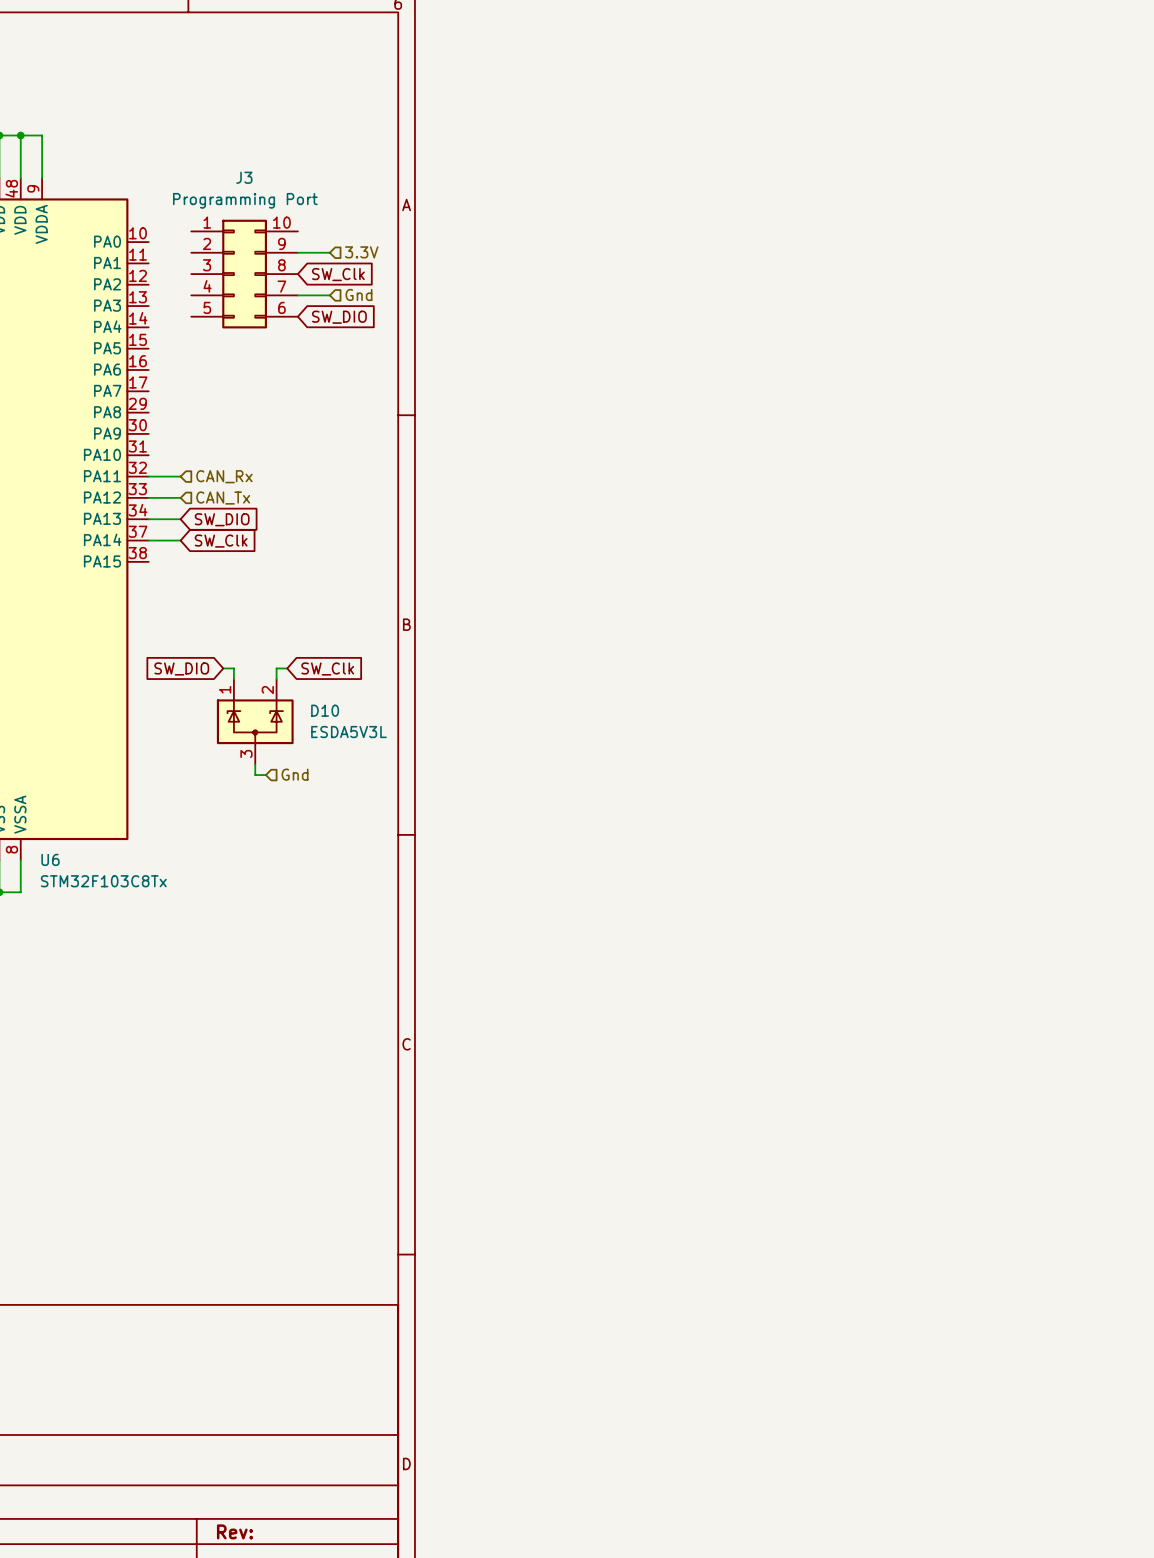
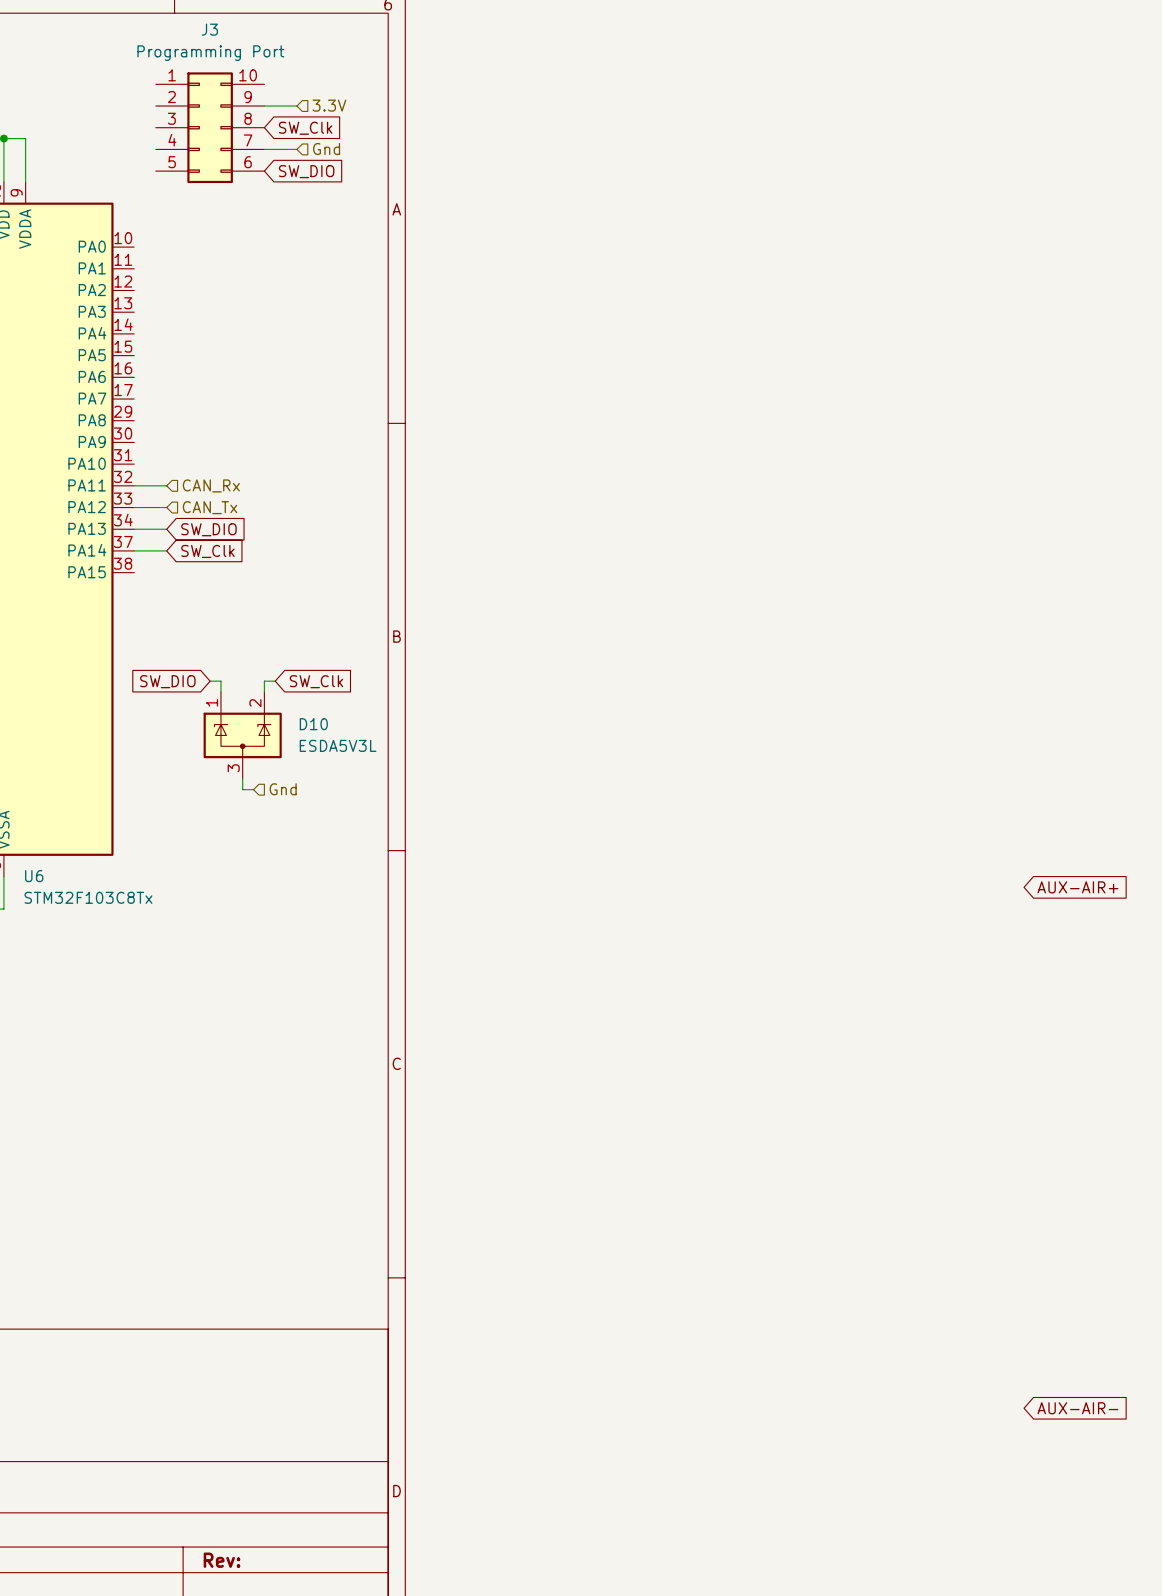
wire: (297, 252) (329, 252) -> (264, 149) (296, 149)
hierarchical label position: 3.3V (361, 252) -> 3.3V (329, 105)
J3 position: (244, 274) -> (210, 127)
global label position: SW_Clk (338, 274) -> SW_Clk (305, 128)
hierarchical label position: Gnd (358, 294) -> Gnd (326, 149)
wire: (297, 295) (329, 295) -> (264, 106) (296, 106)
global label position: SW_DIO (339, 317) -> SW_DIO (306, 171)
global label: none -> AUX-AIR+ (1077, 887)
global label: none -> AUX-AIR- (1077, 1408)

